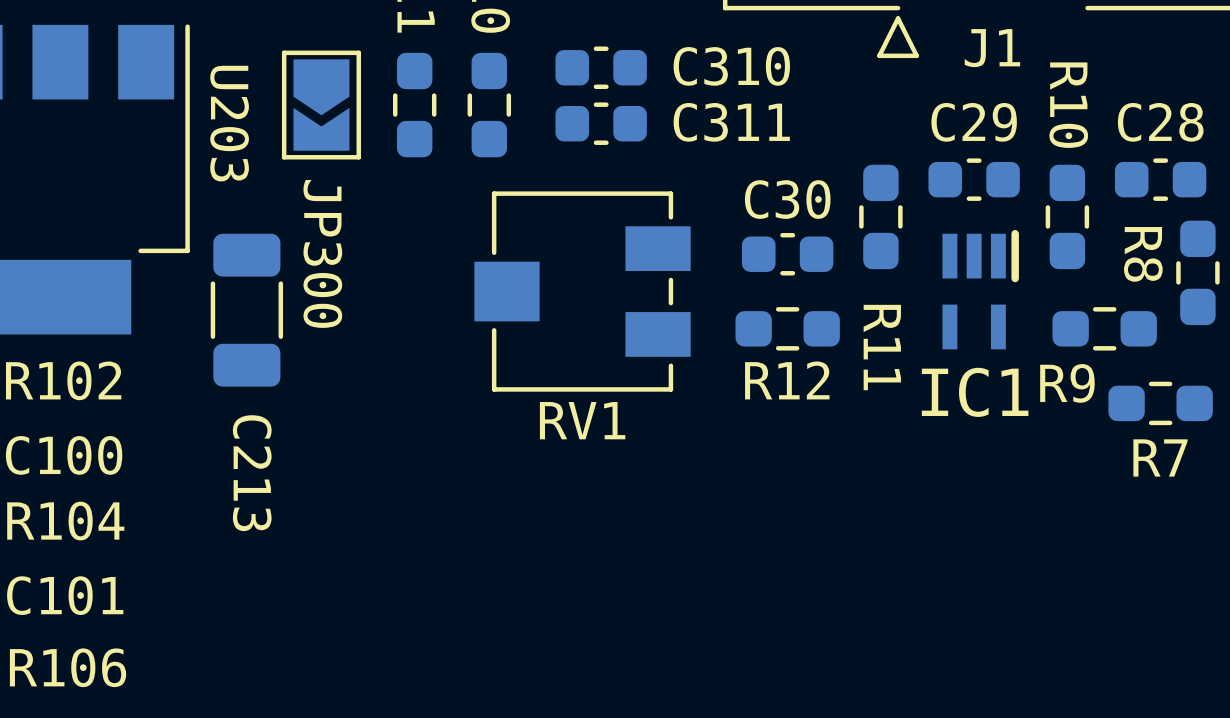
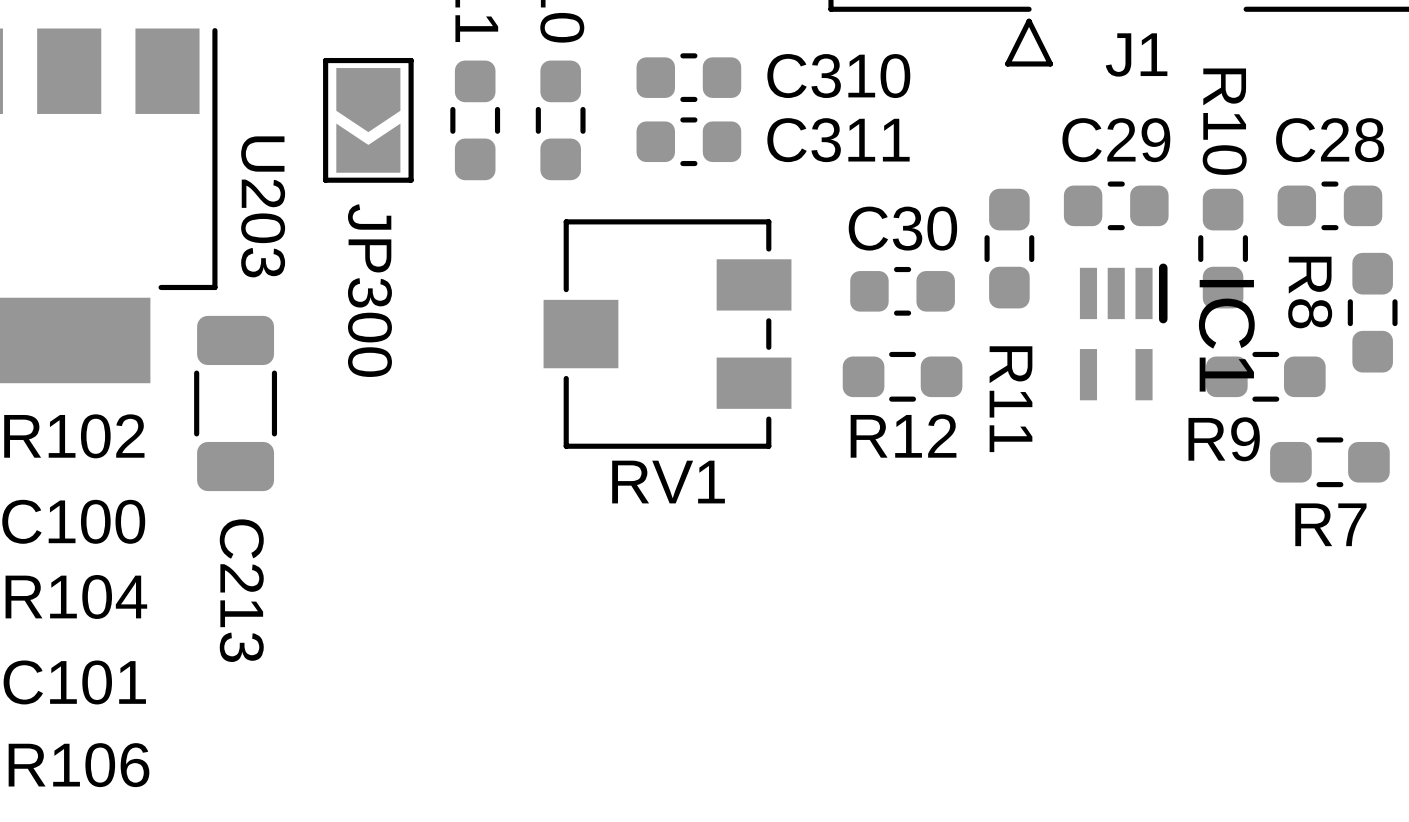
U203 name position: U203 (229, 123) -> U203 (263, 206)
C213 position: (246, 310) -> (235, 403)
IC1 name rotation: 0° (975, 392) -> 90° clockwise (1226, 335)

